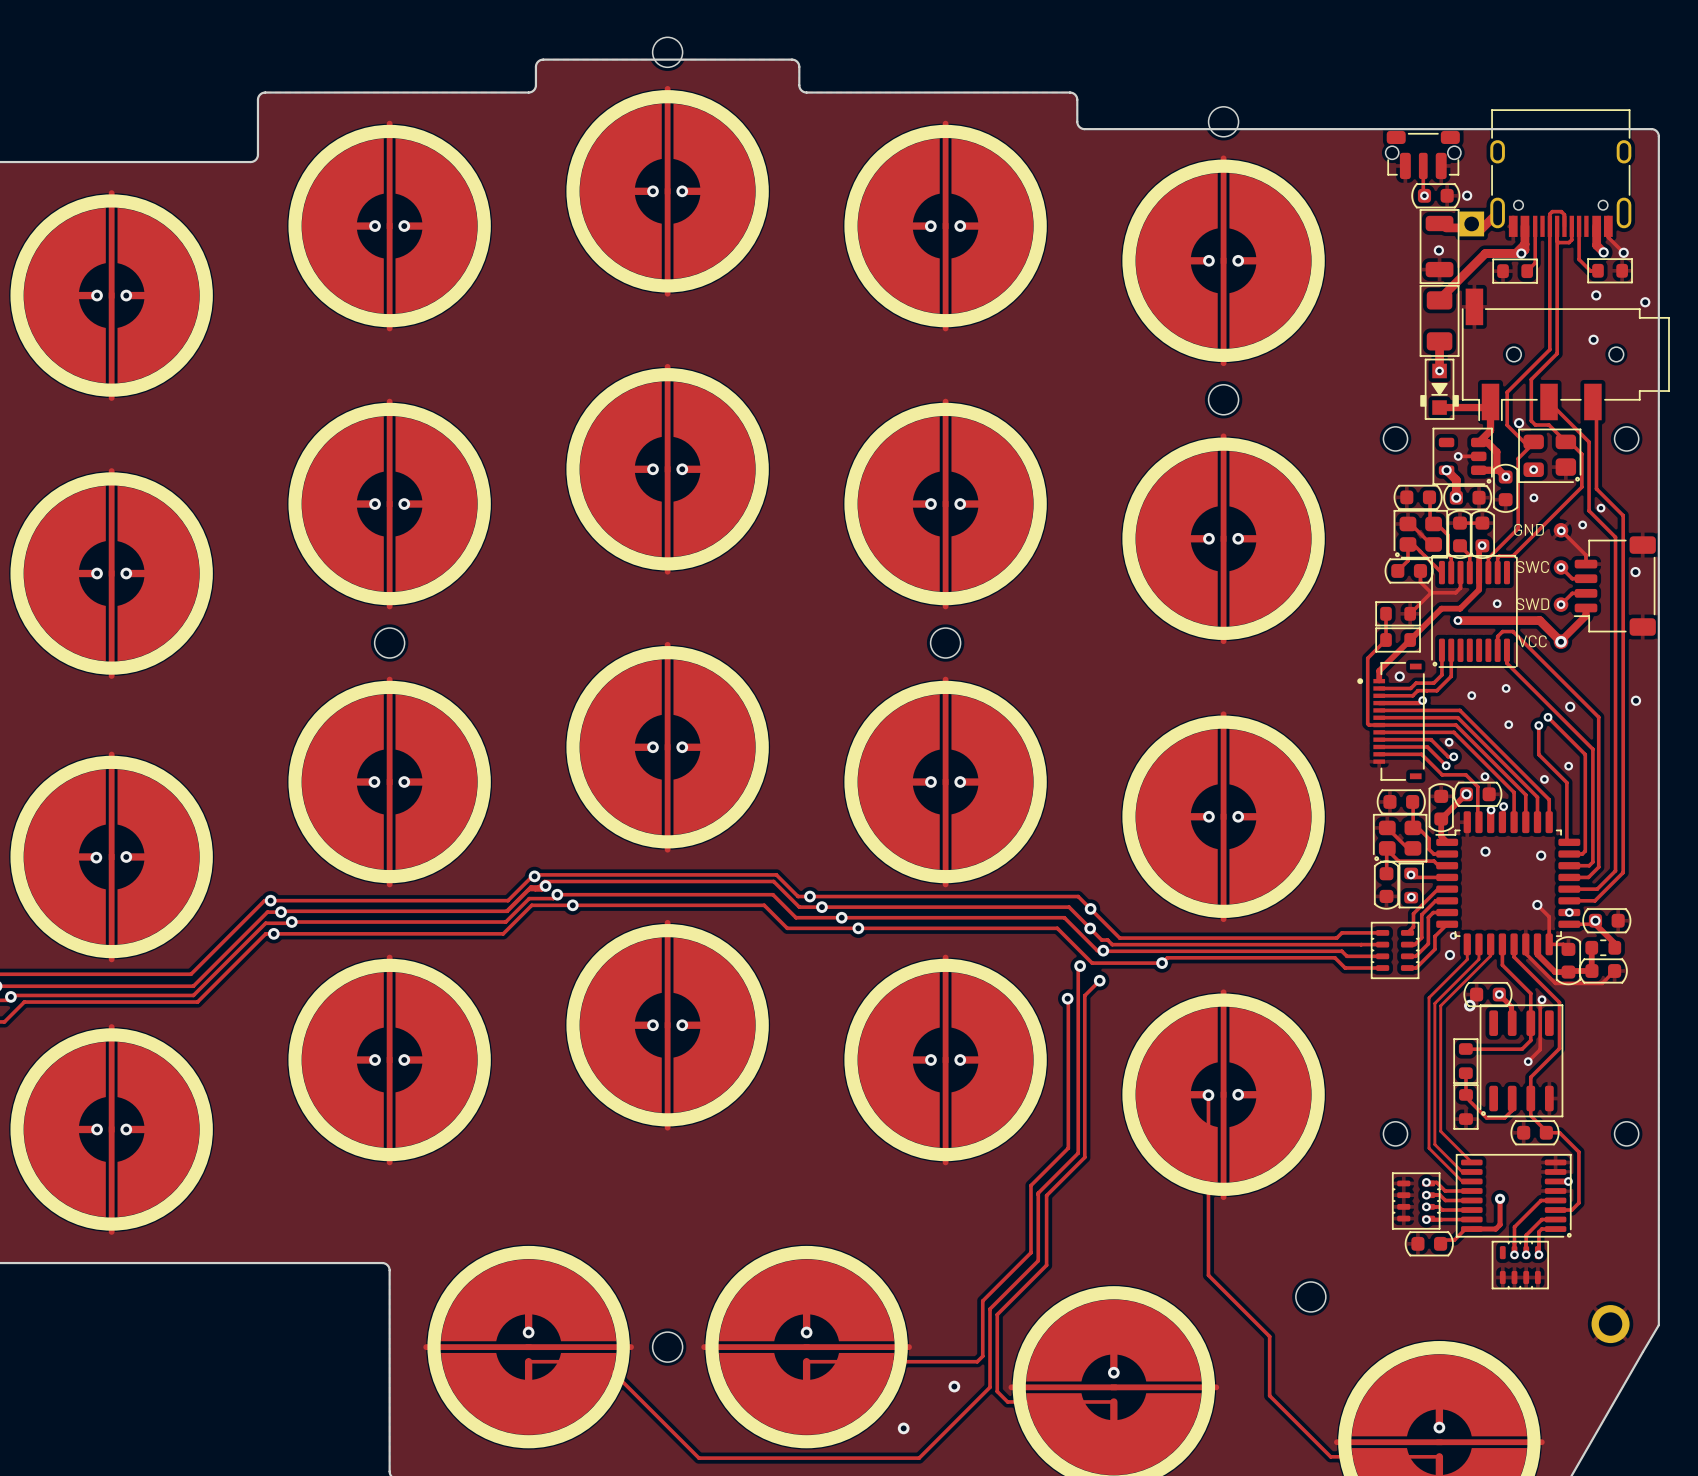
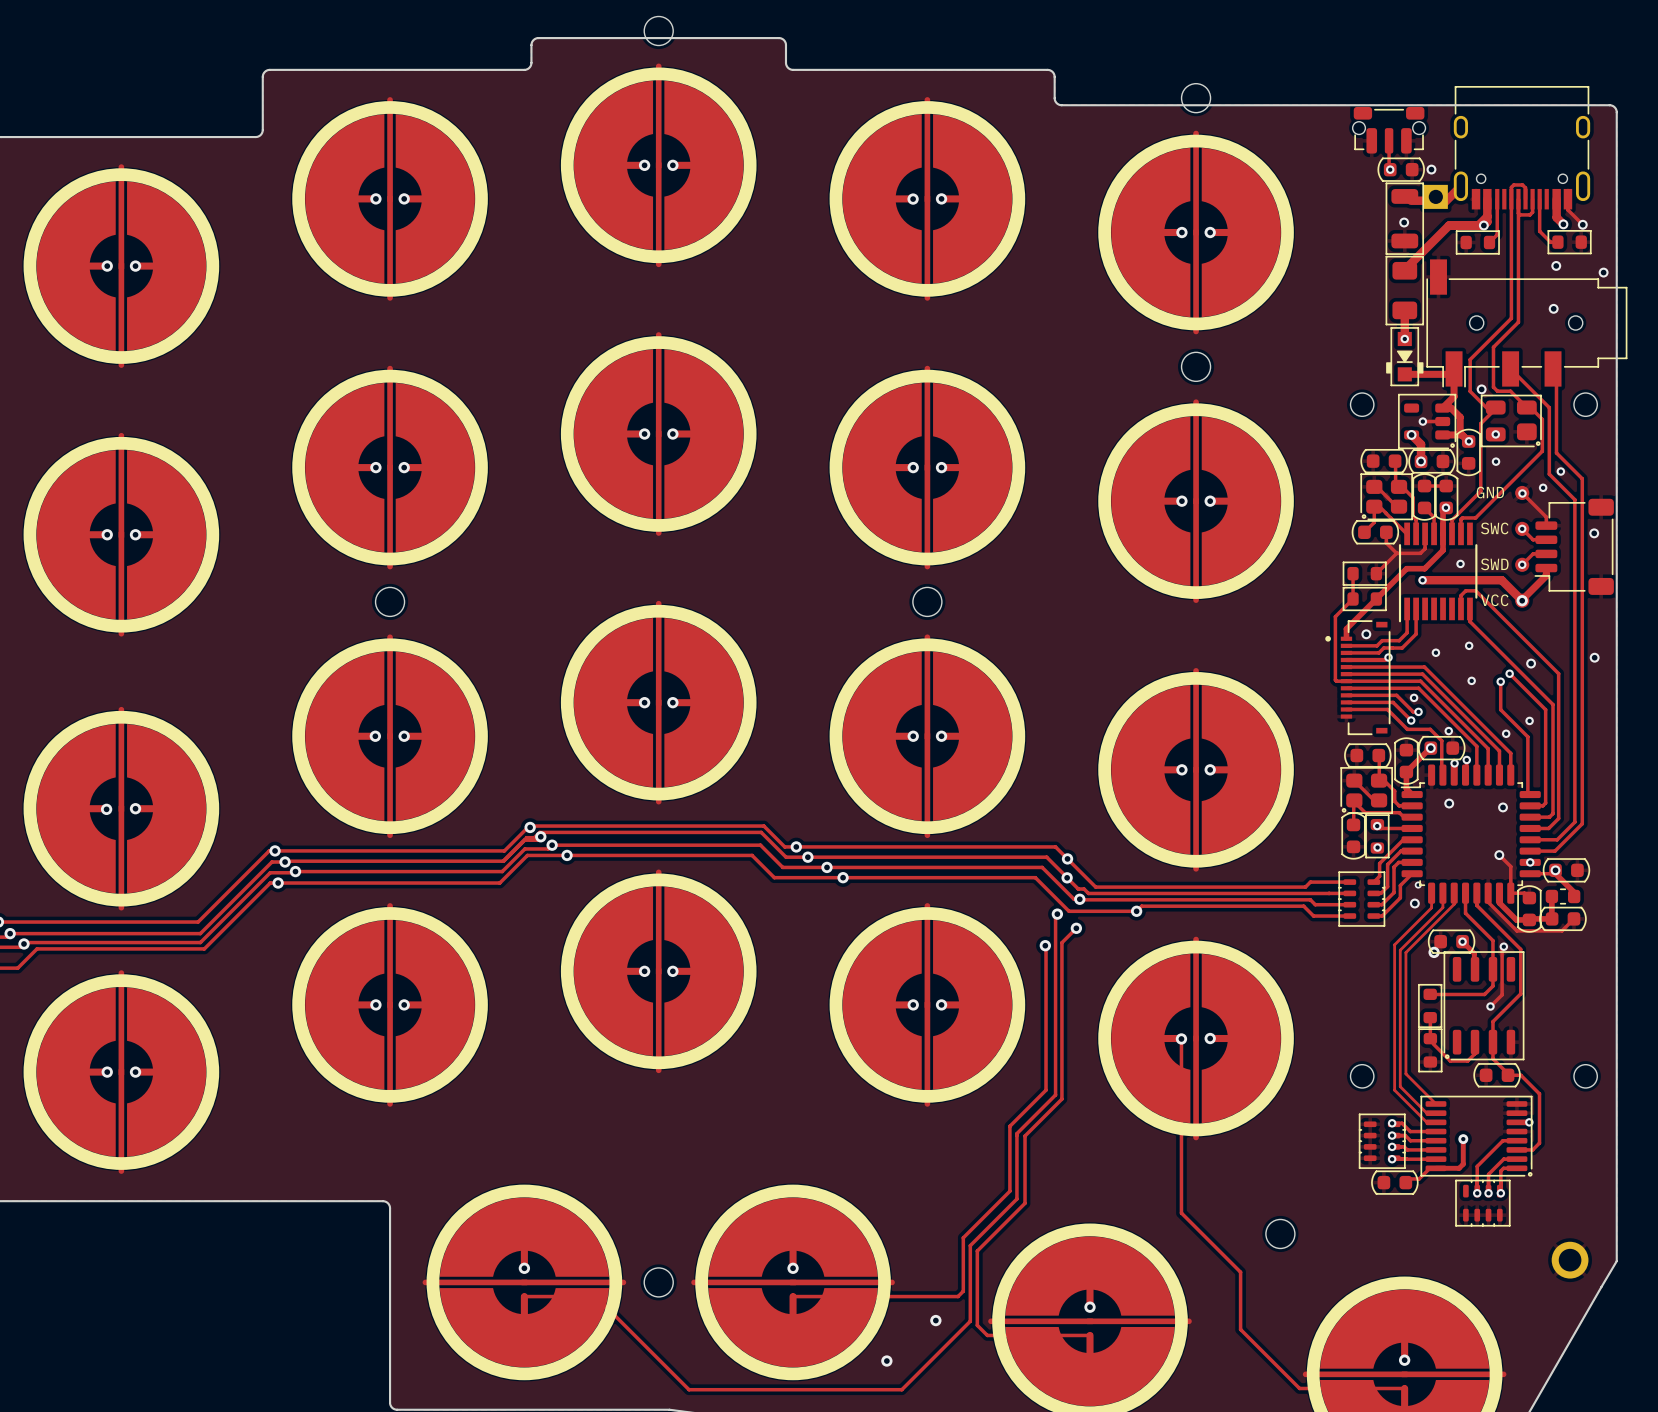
part footprint: [1431, 554, 1518, 668] -> [1398, 522, 1478, 623]

